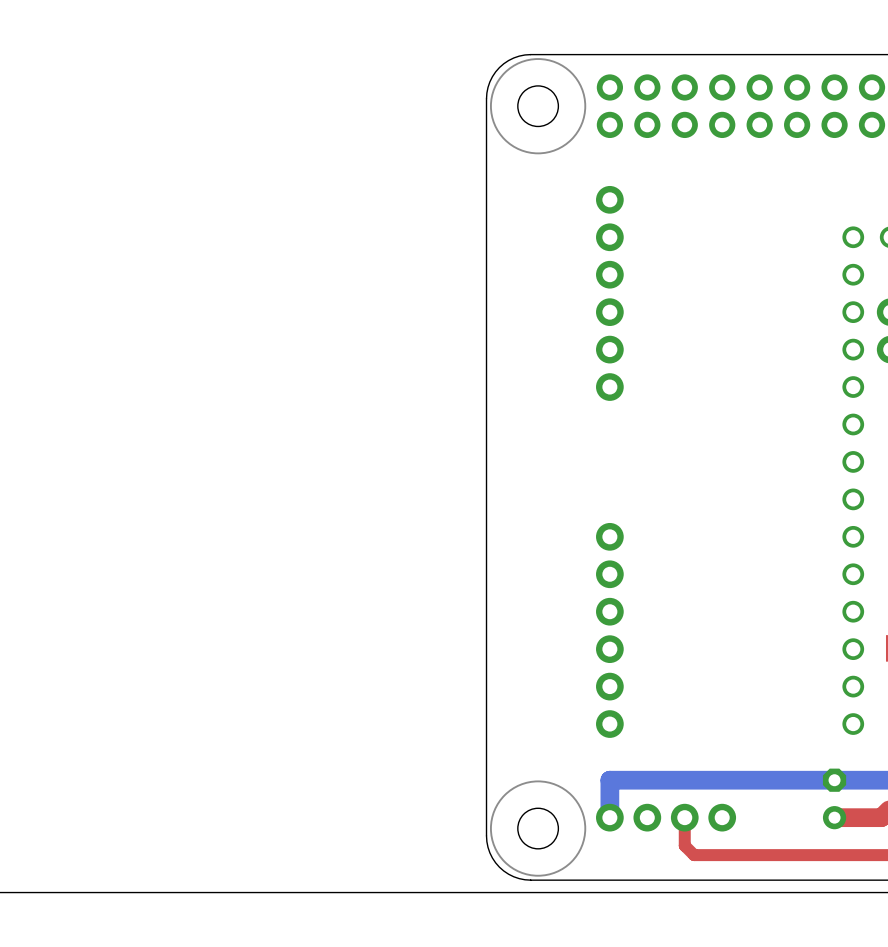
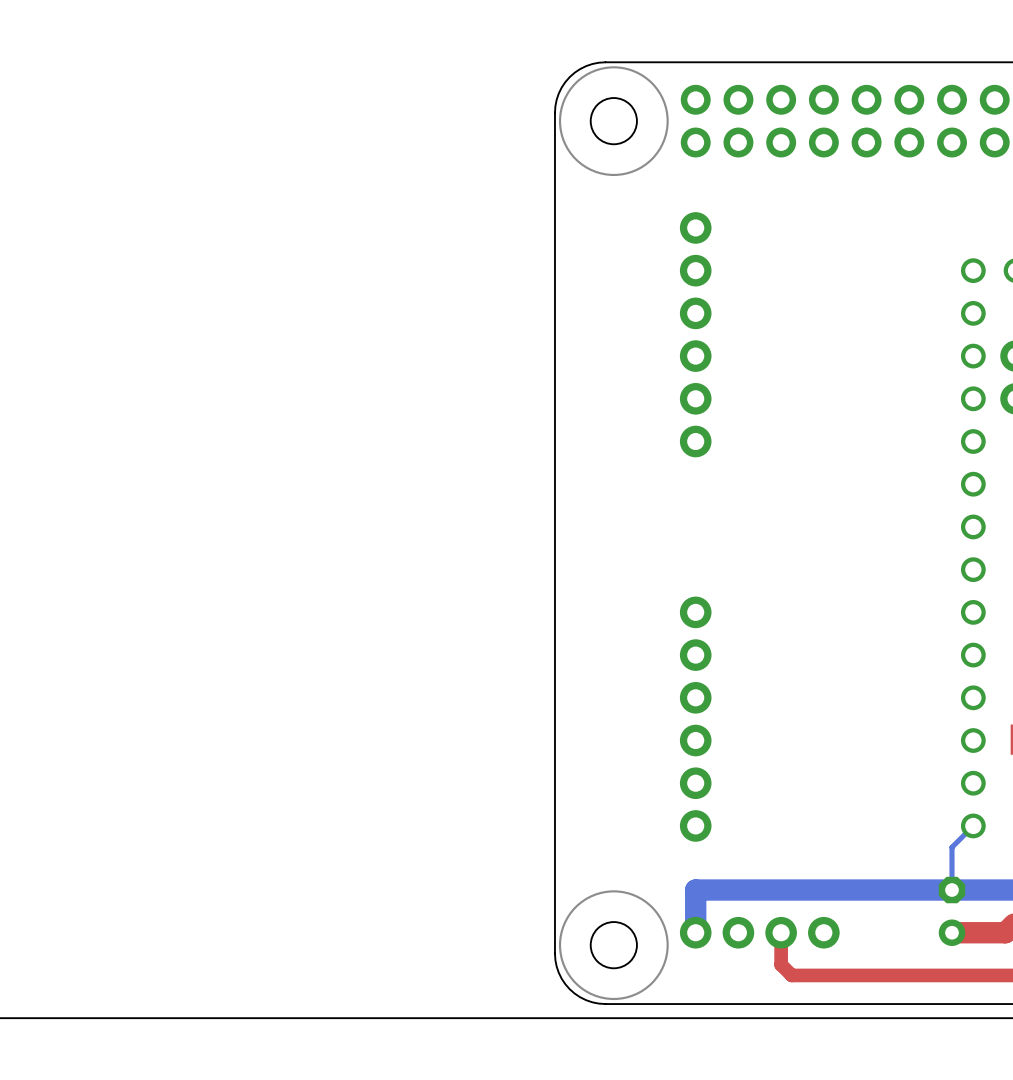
bottom track: none -> (973, 825) (952, 847) (952, 890)

